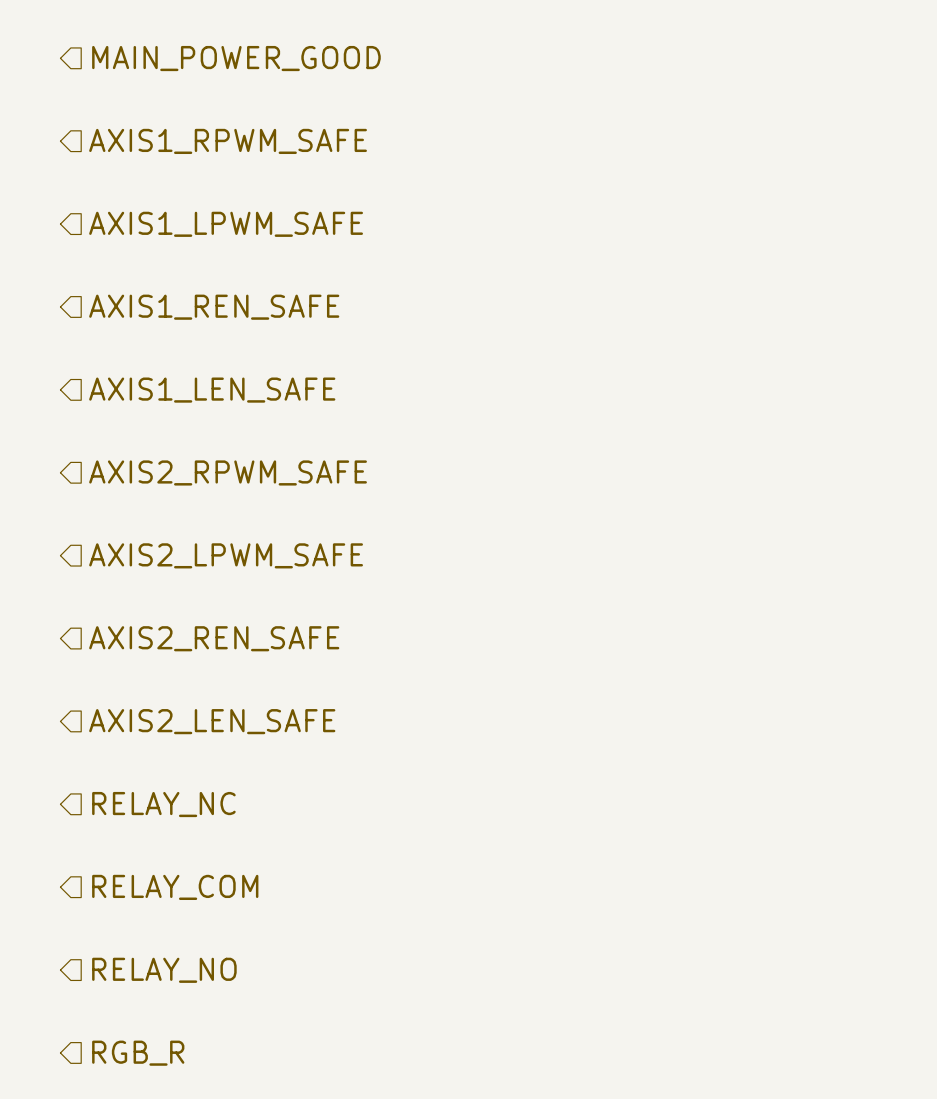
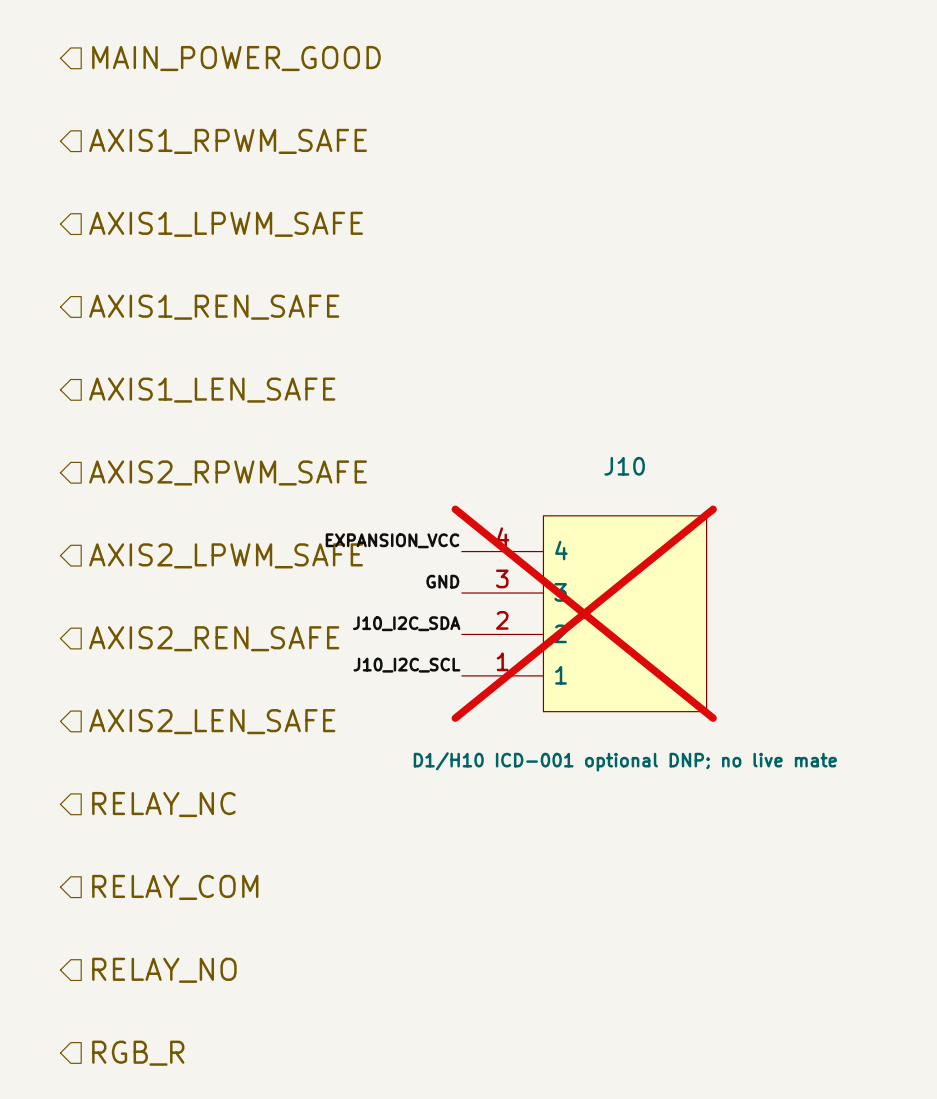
label: none -> EXPANSION_VCC (392, 540)
label: none -> GND (442, 581)
J10: none -> D1/H10 ICD-001 optional DNP; no live mate (584, 613)
label: none -> J10_I2C_SDA (406, 623)
label: none -> J10_I2C_SCL (406, 665)

